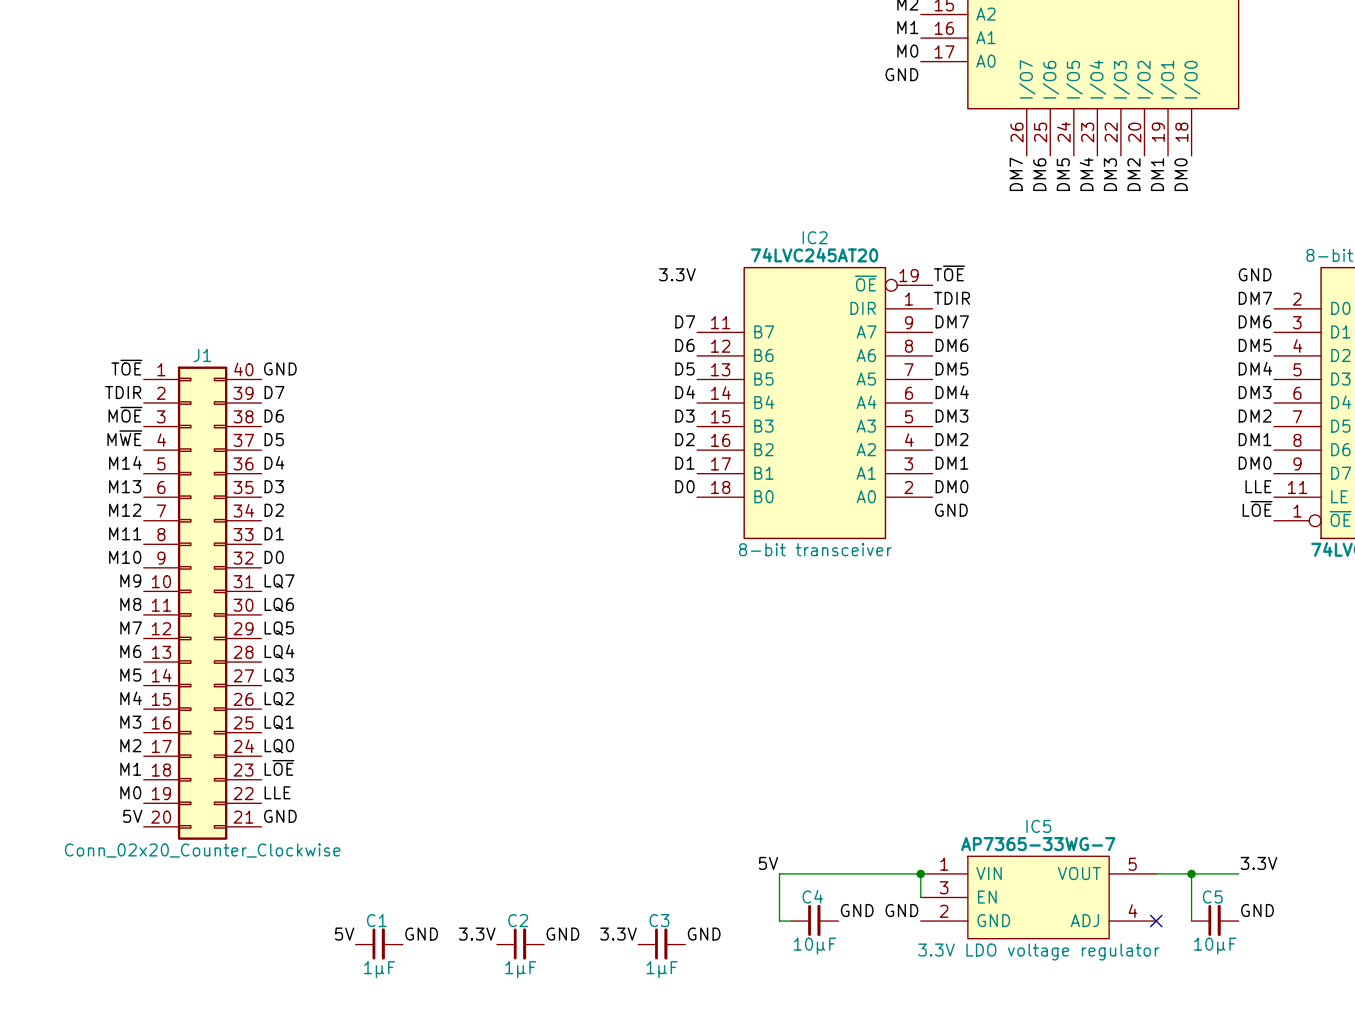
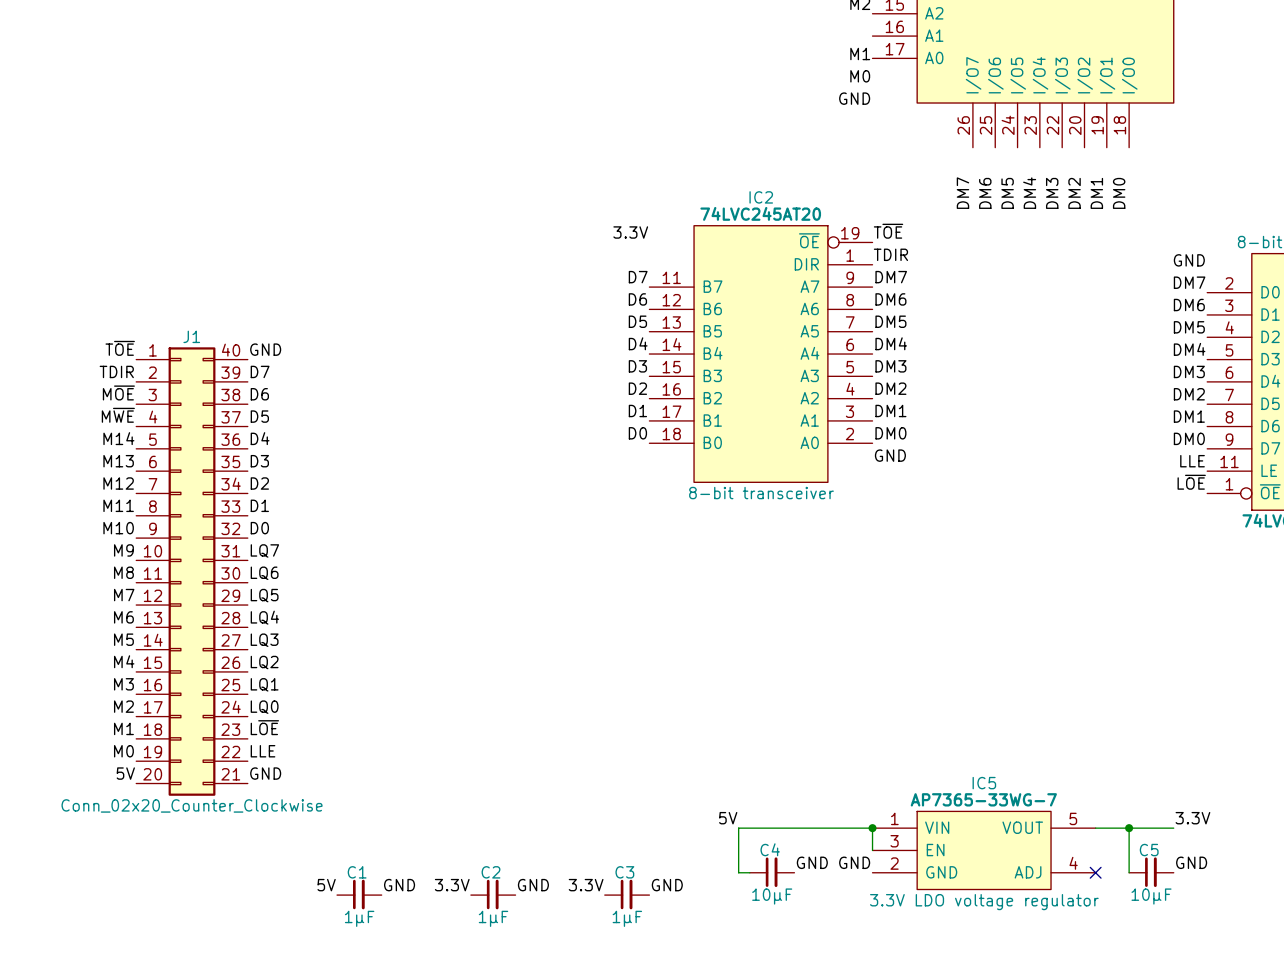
label position: M1 (907, 27) -> M1 (860, 54)
label position: M0 (907, 51) -> M0 (860, 76)
label position: GND (901, 74) -> GND (854, 98)
label position: DM7 (1016, 174) -> DM7 (962, 193)
label position: DM6 (1039, 174) -> DM6 (985, 193)
label position: DM5 (1063, 174) -> DM5 (1007, 193)
label position: DM4 (1086, 174) -> DM4 (1029, 193)
label position: DM3 (1110, 174) -> DM3 (1052, 193)
label position: DM2 (1133, 174) -> DM2 (1074, 193)
label position: DM1 (1157, 174) -> DM1 (1096, 193)
label position: DM0 (1181, 174) -> DM0 (1119, 193)
label position: T~{OE} (949, 273) -> T~{OE} (888, 231)
label position: 3.3V (677, 274) -> 3.3V (630, 232)
label position: TDIR (951, 298) -> TDIR (890, 254)
label position: D7 (685, 321) -> D7 (638, 277)
label position: DM7 (952, 321) -> DM7 (891, 277)
label position: D6 (684, 345) -> D6 (637, 299)
label position: DM6 (951, 345) -> DM6 (890, 299)
label position: D5 (684, 368) -> D5 (637, 321)
label position: DM5 (951, 368) -> DM5 (890, 321)
label position: D4 (685, 392) -> D4 (638, 343)
label position: DM4 (952, 392) -> DM4 (891, 343)
IC2 position: (814, 403) -> (760, 354)
label position: D3 (684, 416) -> D3 (637, 366)
label position: DM3 (951, 416) -> DM3 (890, 366)
label position: D2 (684, 439) -> D2 (637, 388)
label position: DM2 (951, 439) -> DM2 (890, 388)
label position: D1 (684, 463) -> D1 (637, 410)
label position: DM1 (951, 463) -> DM1 (890, 410)
label position: D0 (684, 486) -> D0 (637, 433)
label position: DM0 (951, 486) -> DM0 (890, 433)
label position: GND (951, 510) -> GND (890, 455)

